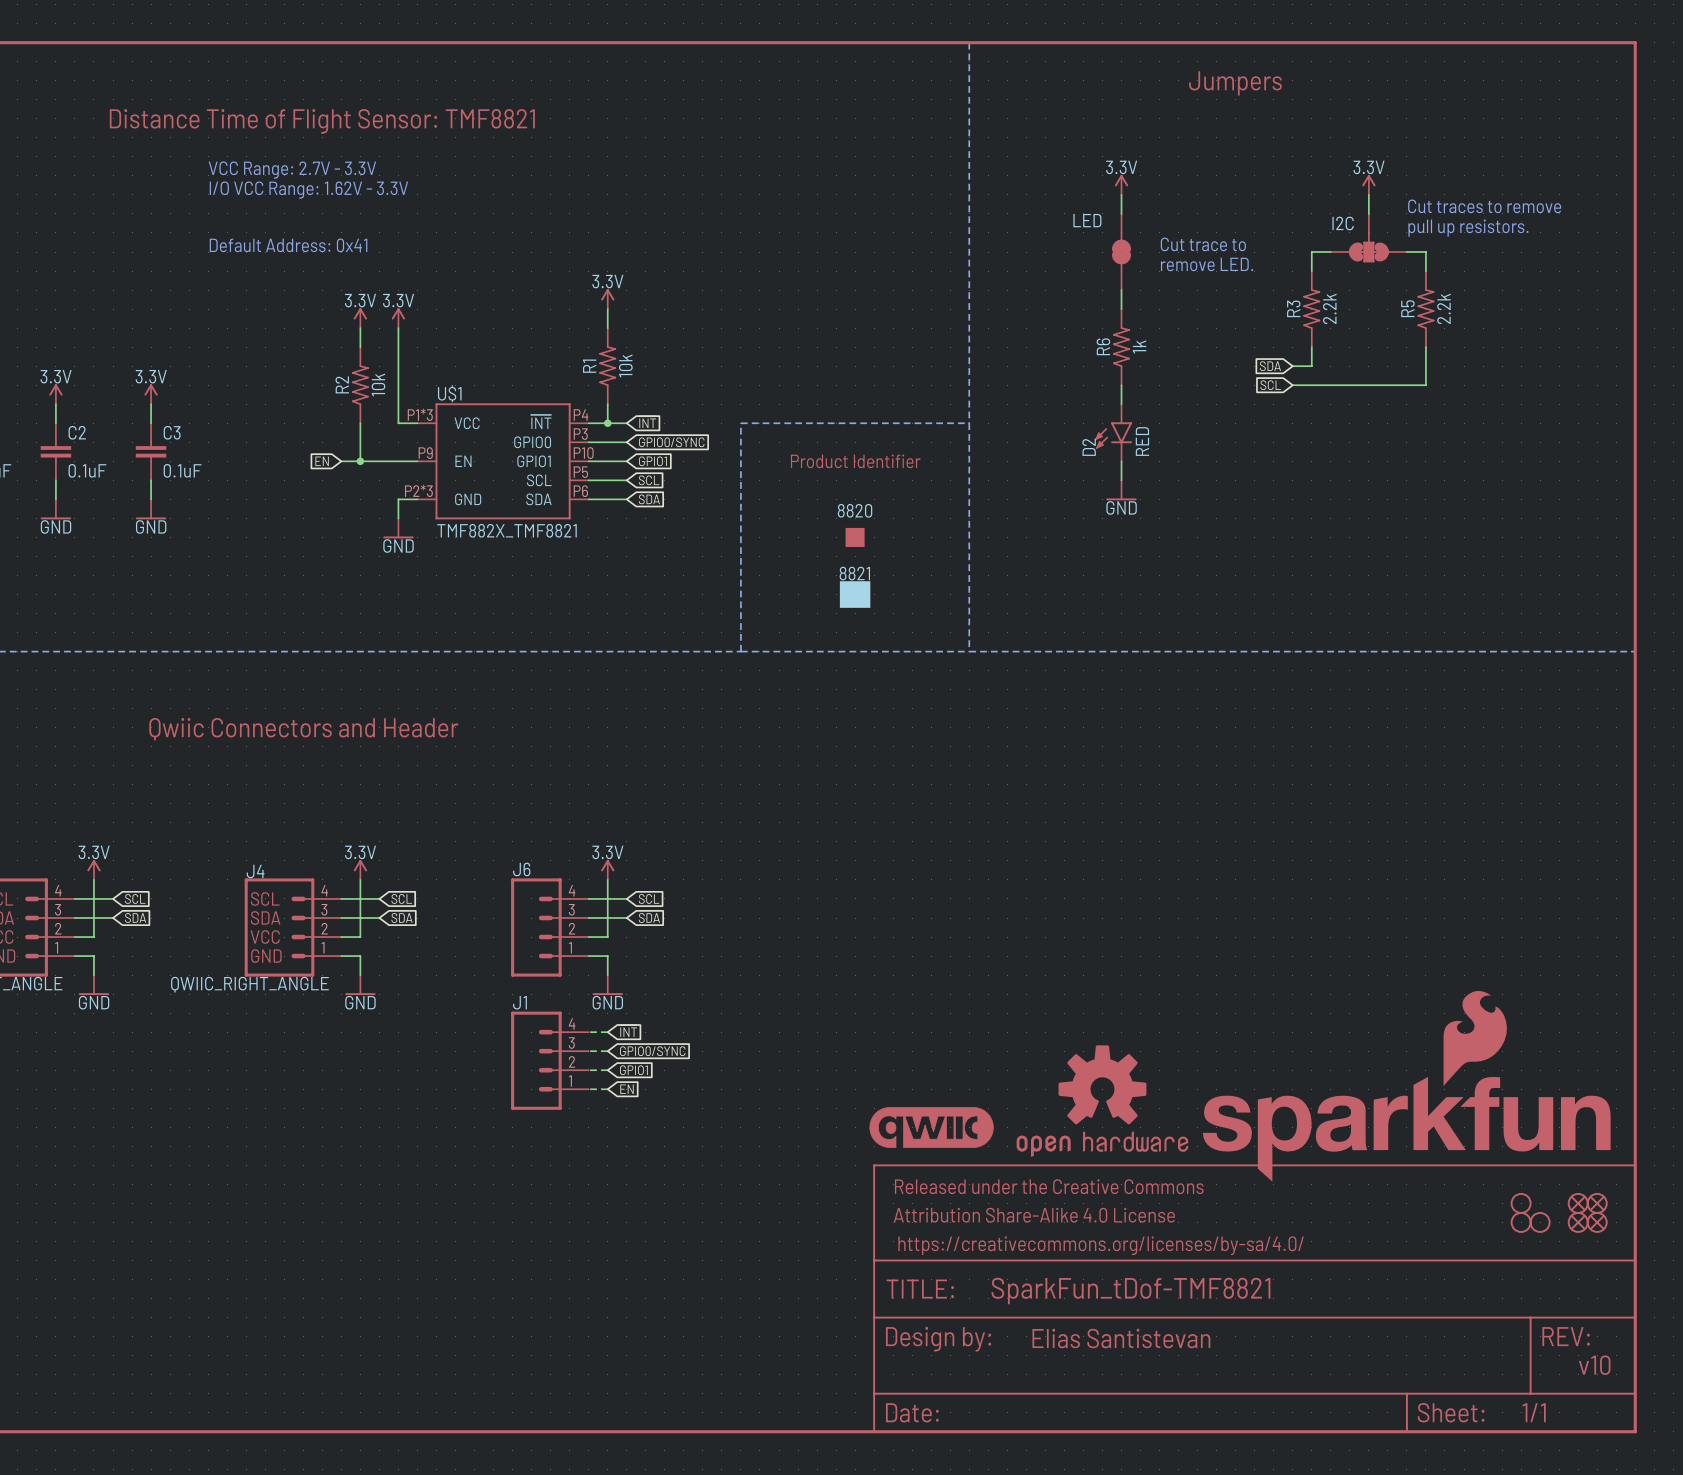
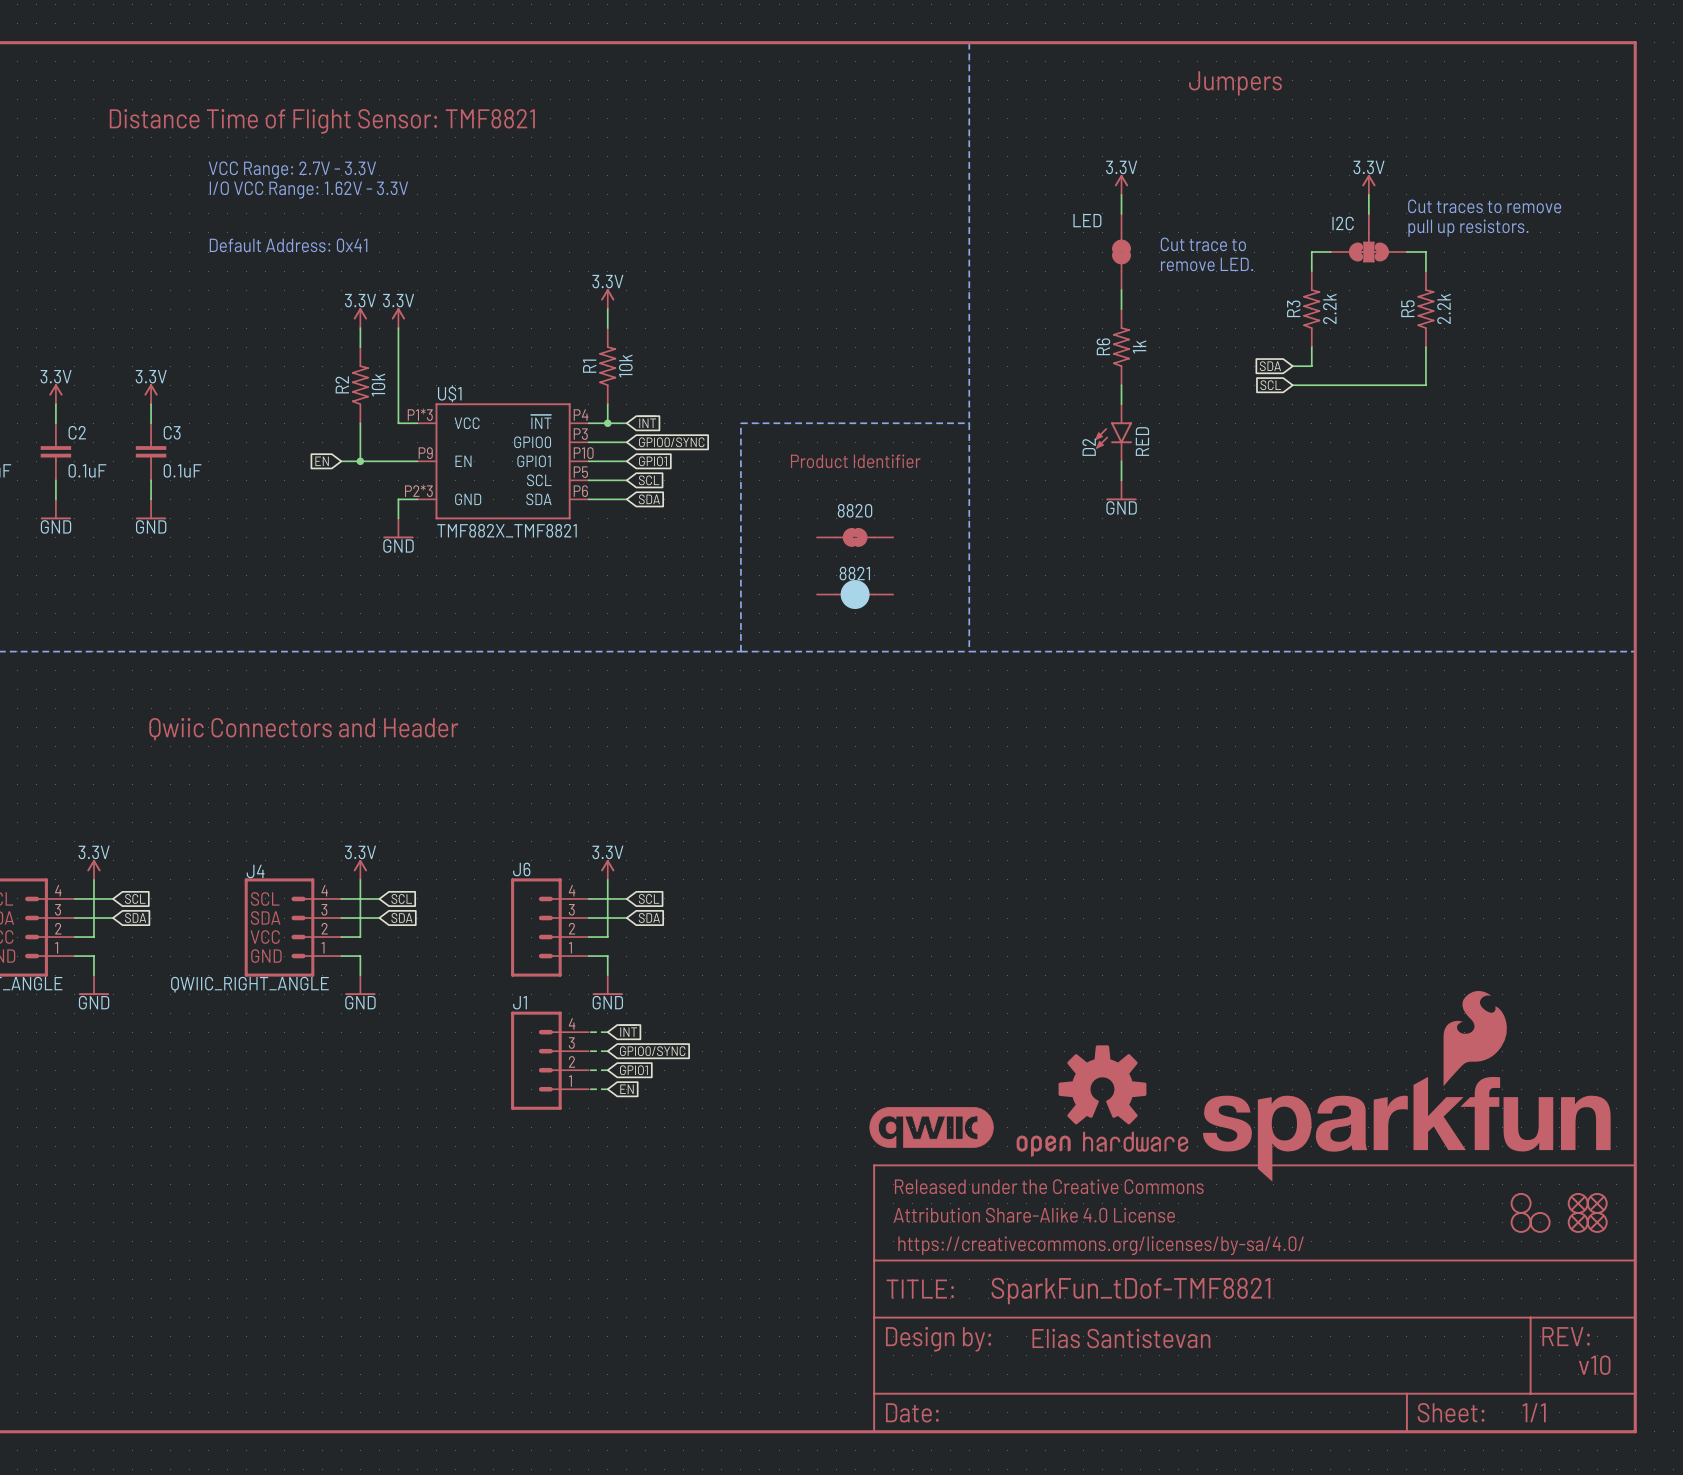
8820 symbol: [845, 527, 865, 547] -> [817, 527, 894, 547]
8821 symbol: [839, 581, 871, 608] -> [817, 580, 894, 610]

